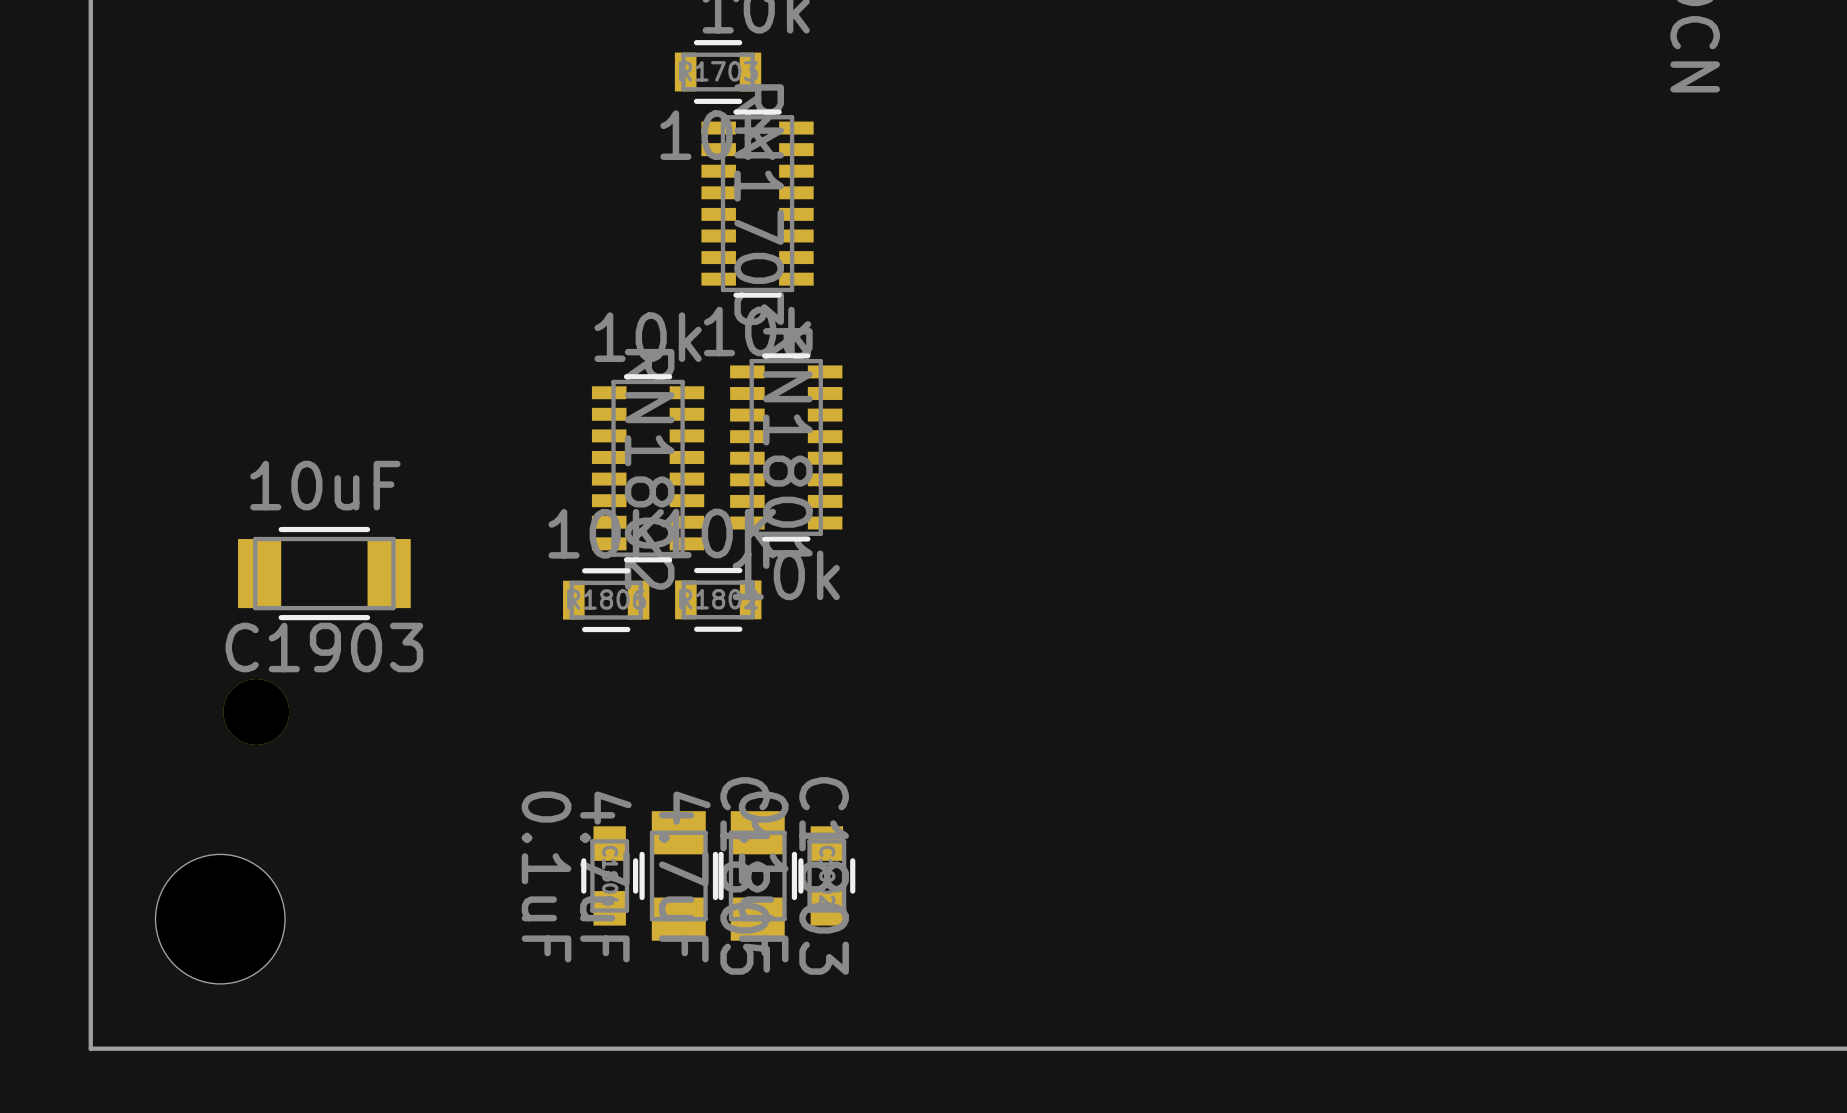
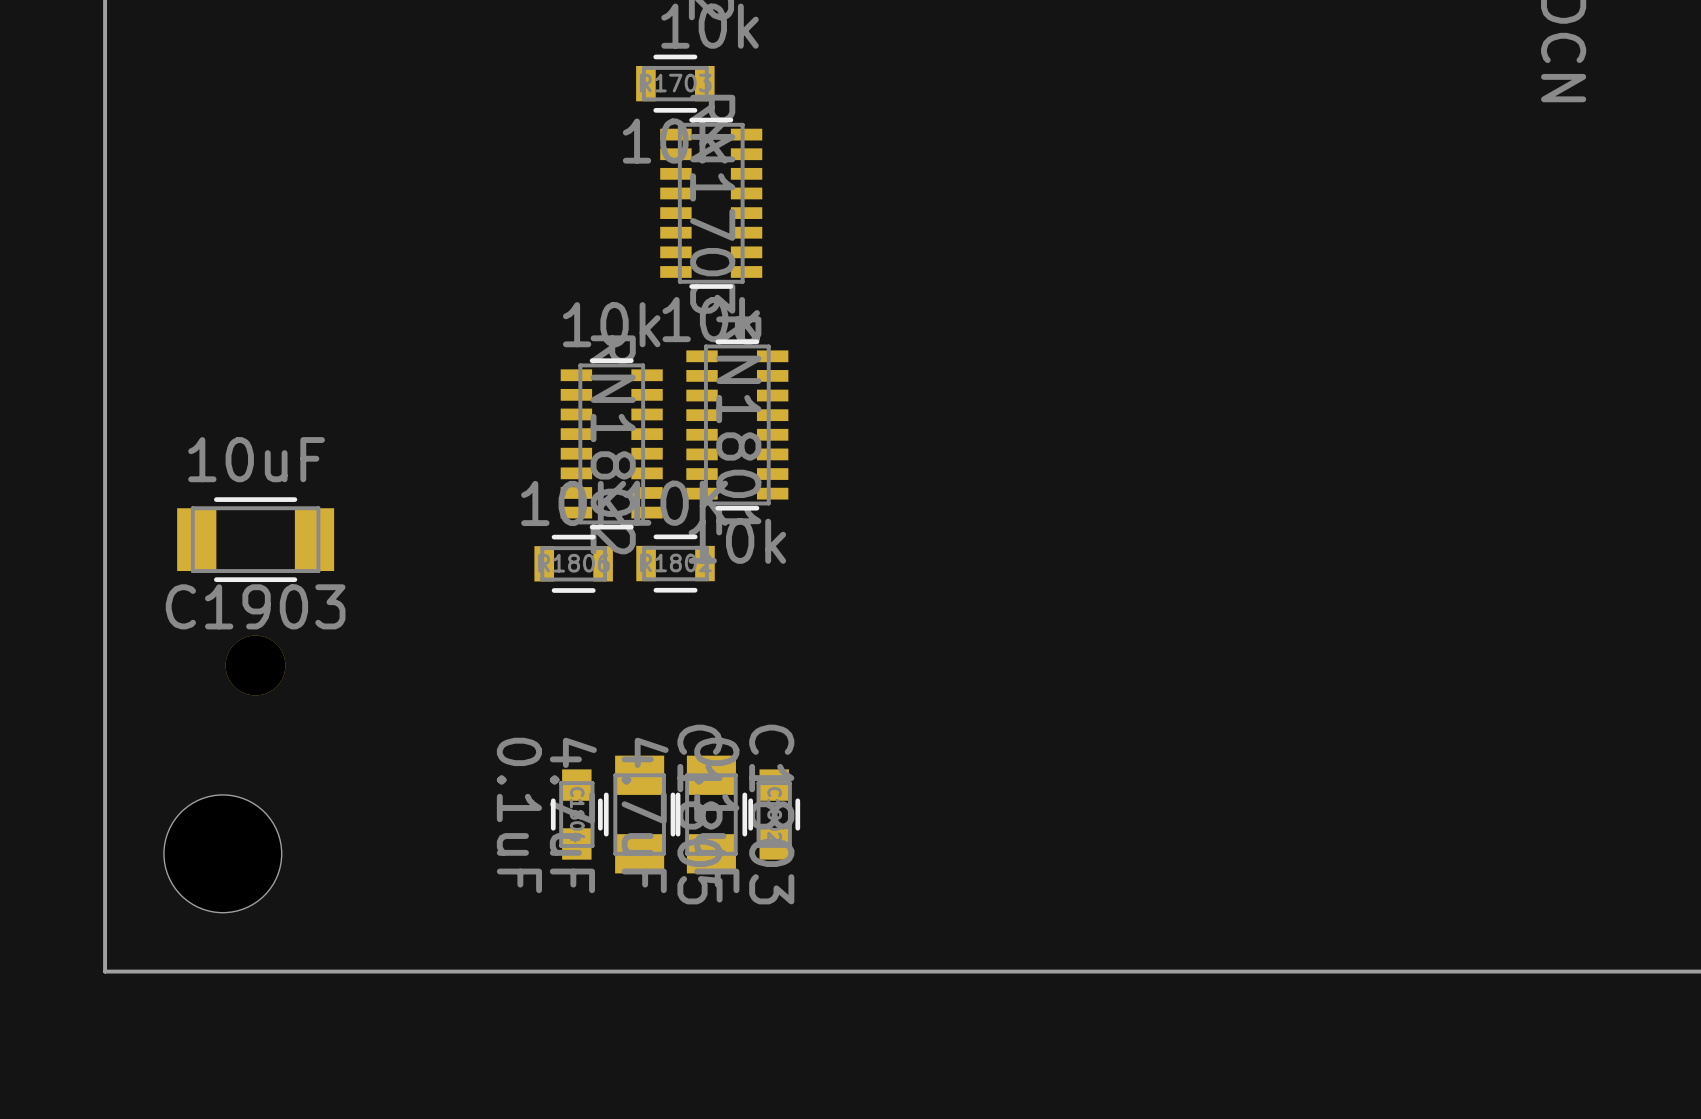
C1903 position: (324, 573) -> (255, 539)

